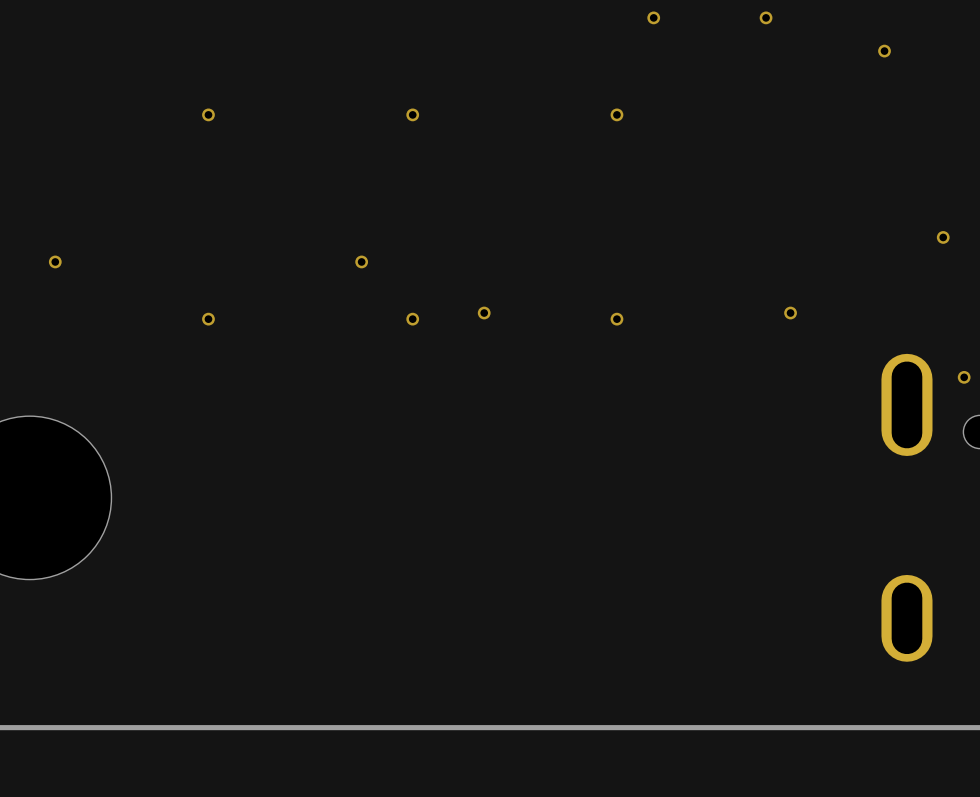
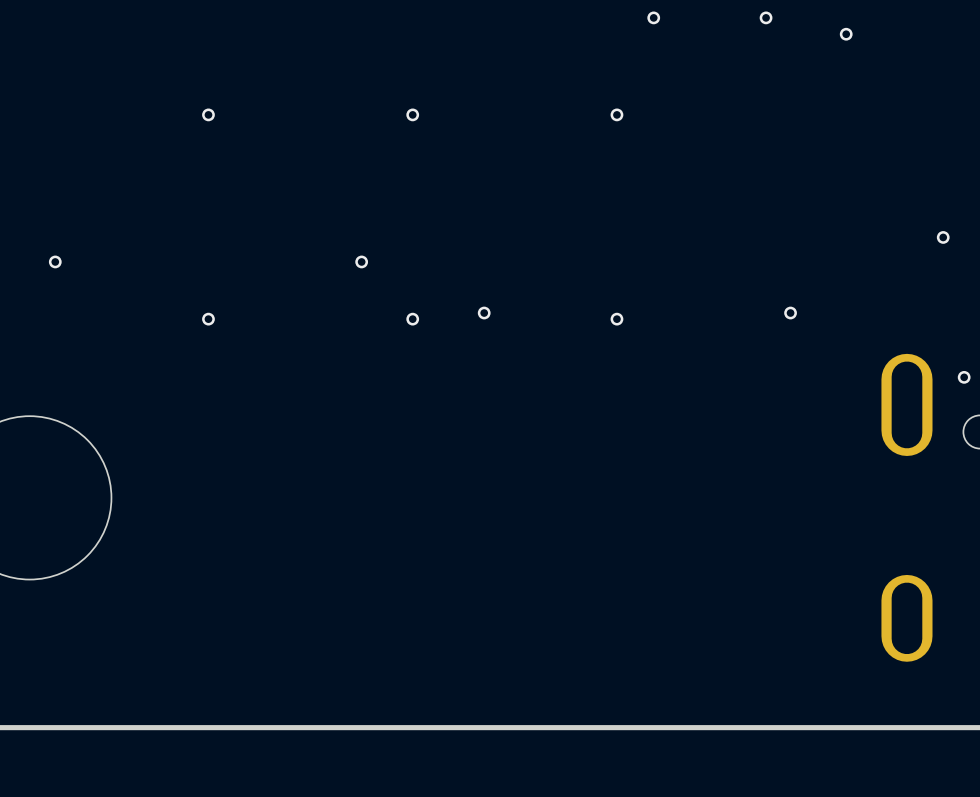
via position: (884, 51) -> (846, 34)

